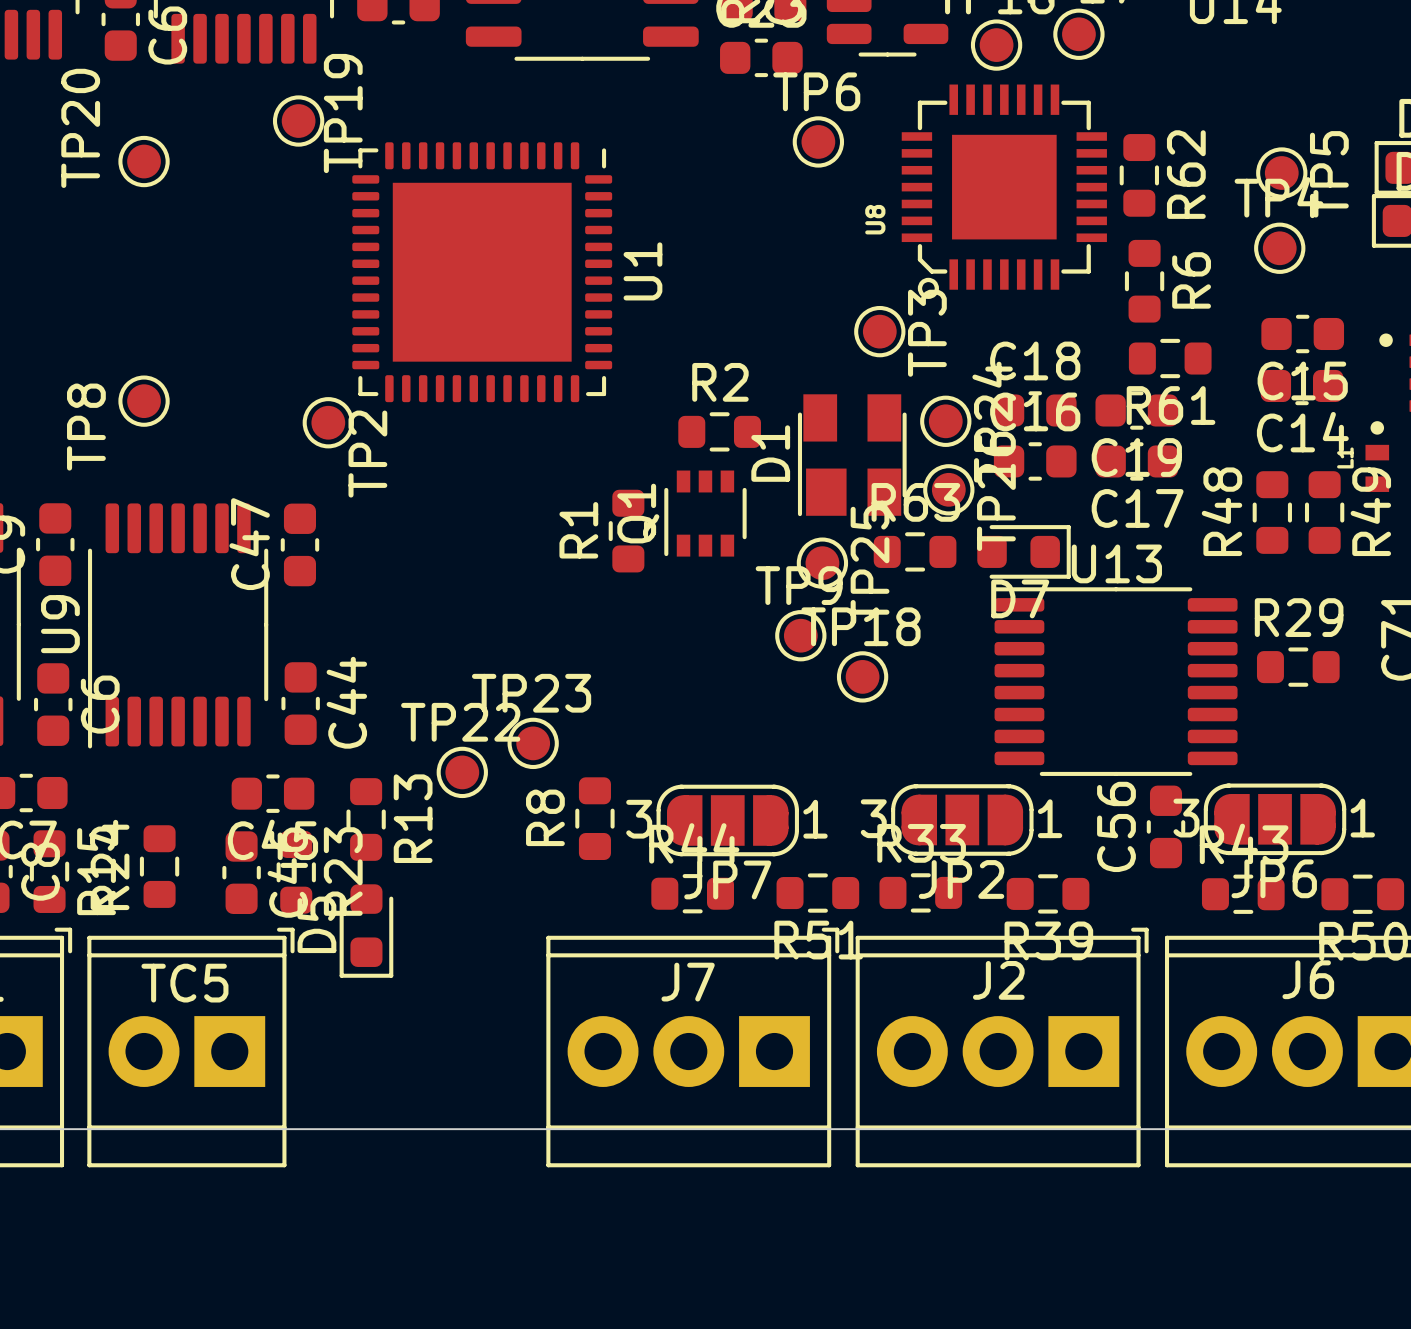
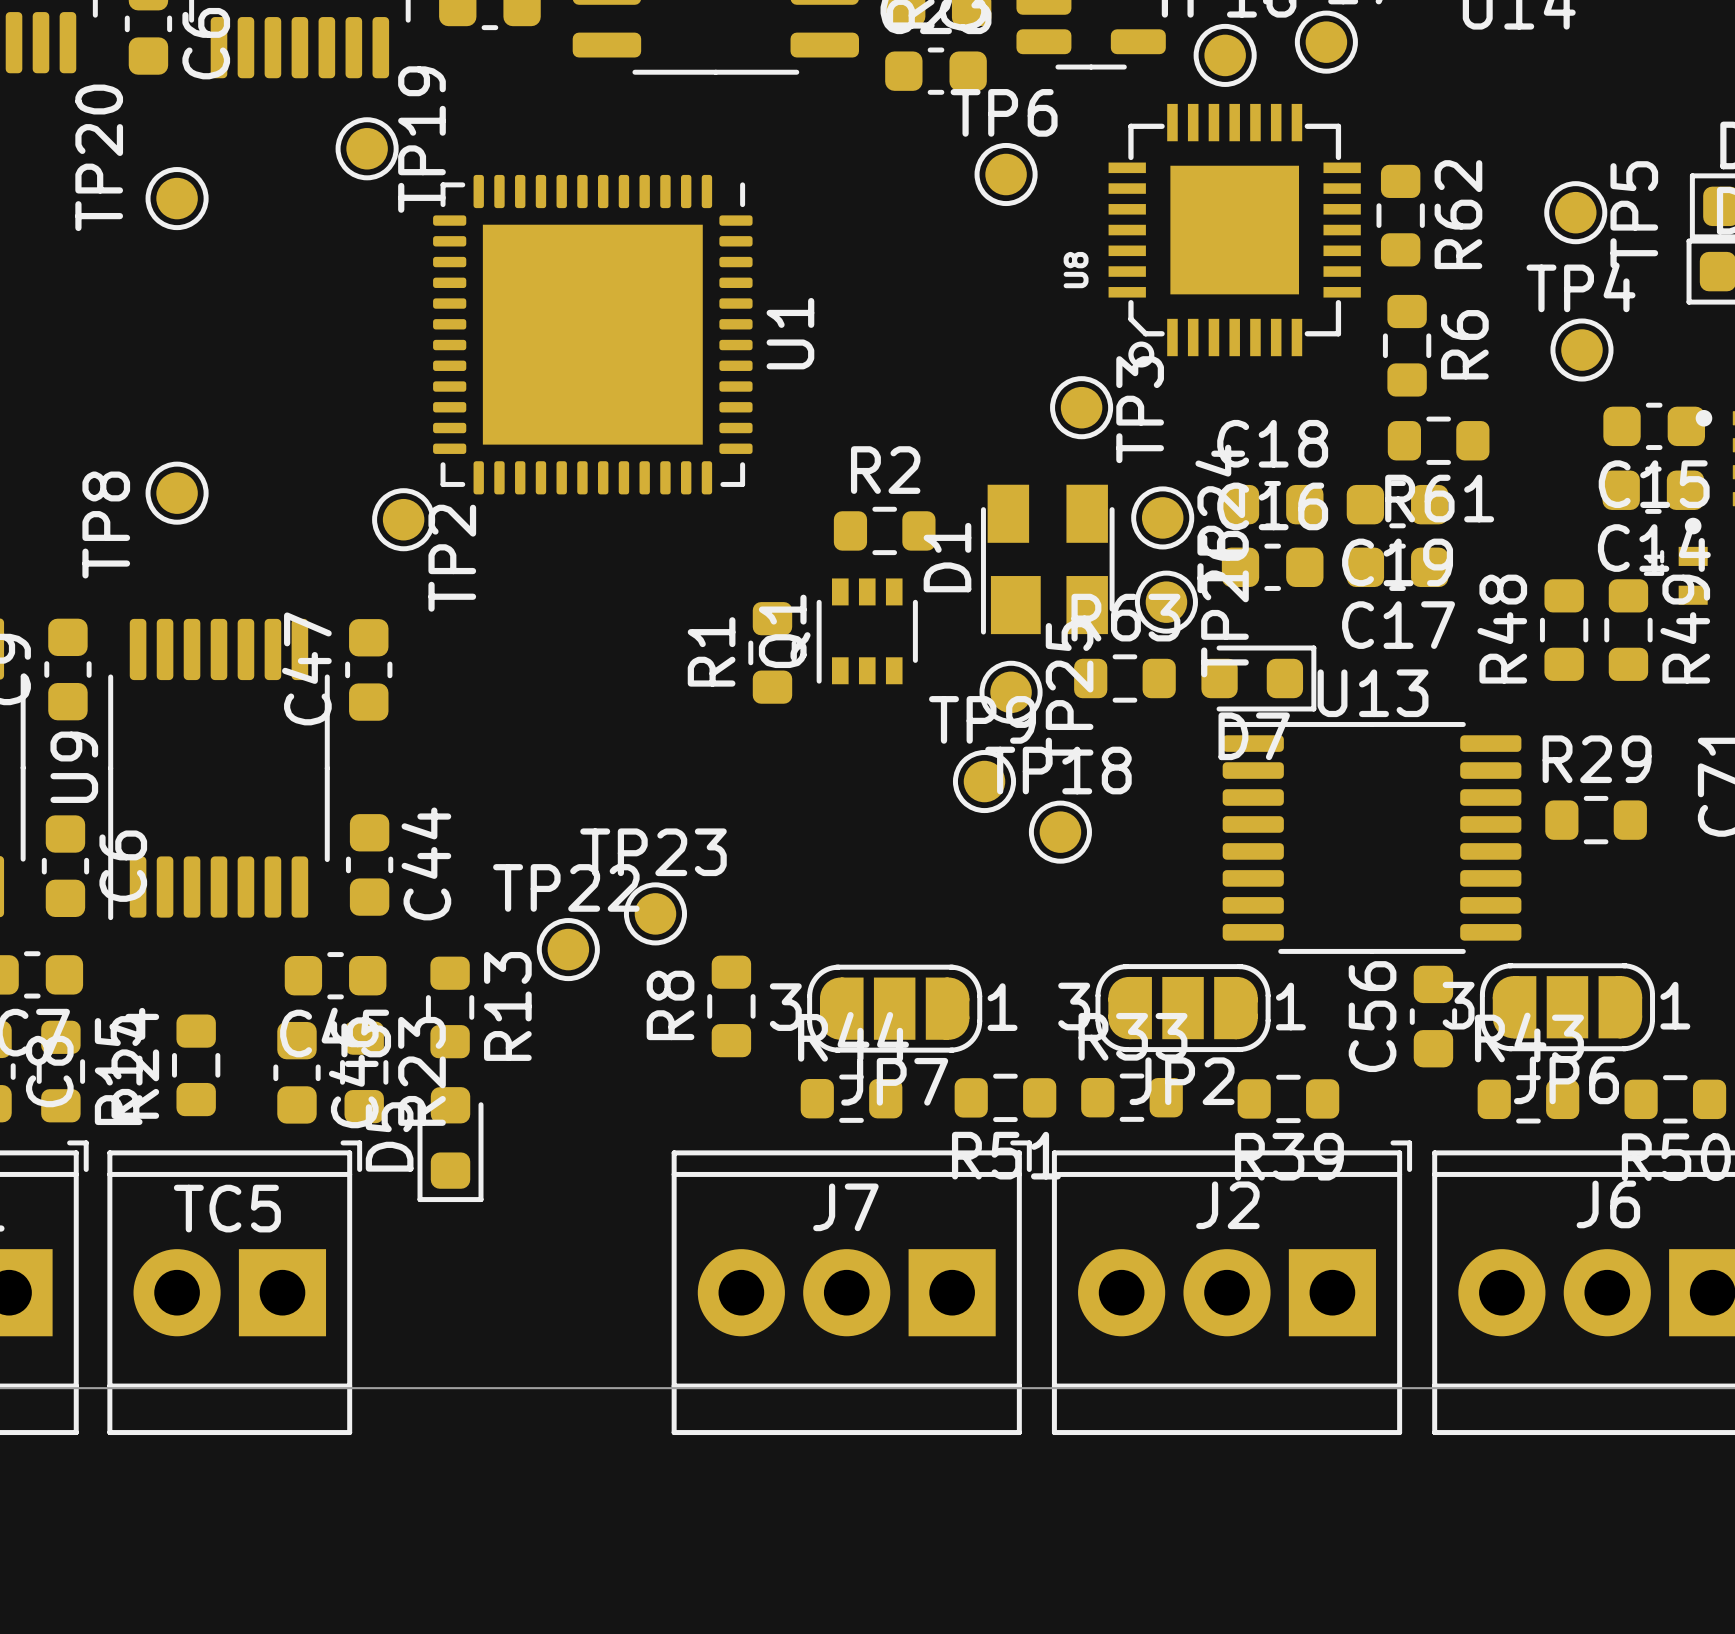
TP4 position: (1279, 248) -> (1581, 350)
C15 position: (1302, 333) -> (1654, 426)
C14 position: (1302, 385) -> (1653, 490)

